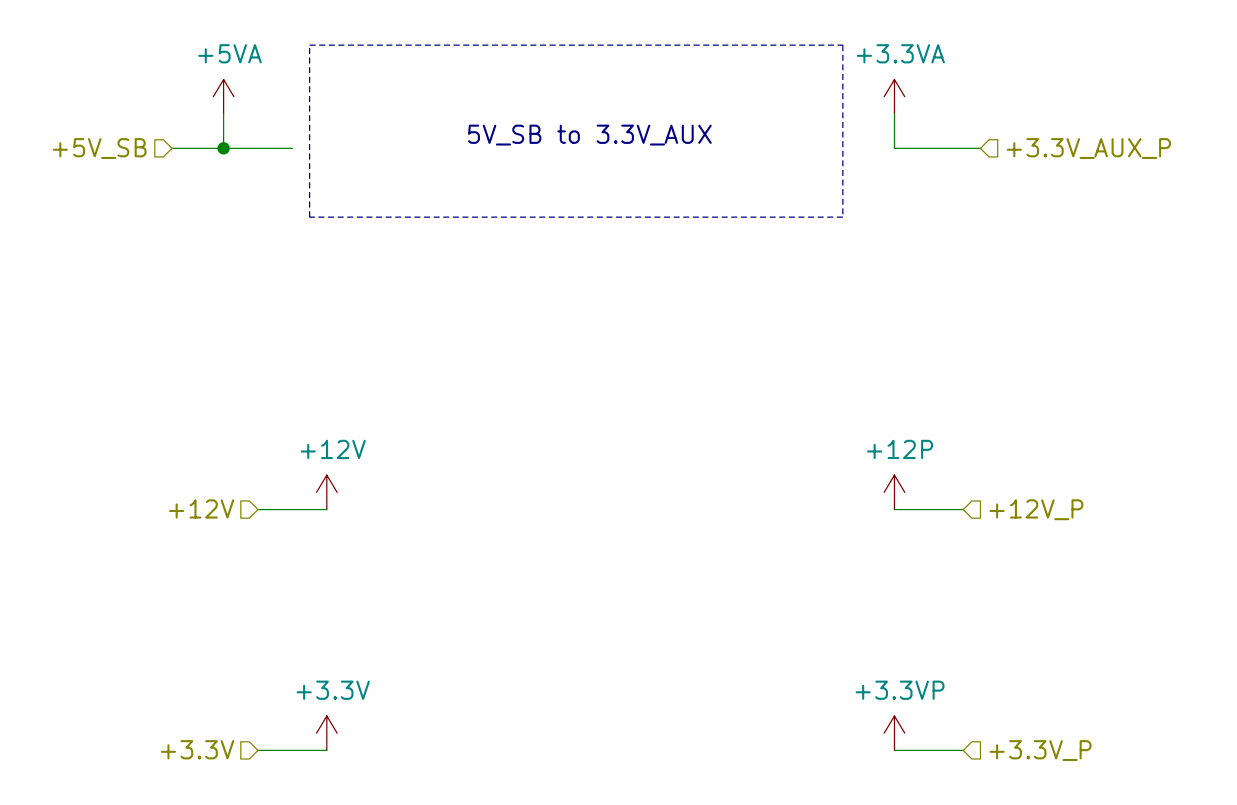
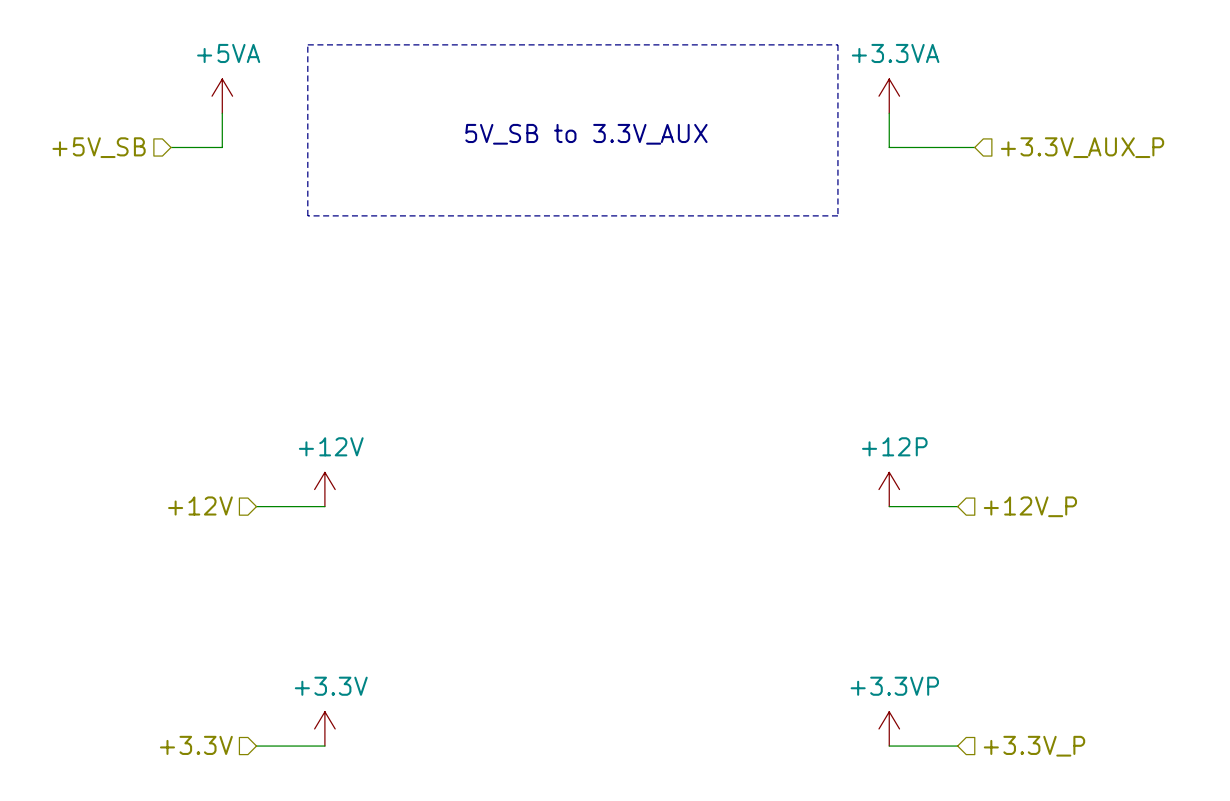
wire: (223, 148) (292, 148) -> none
junction: (223, 148) -> none

